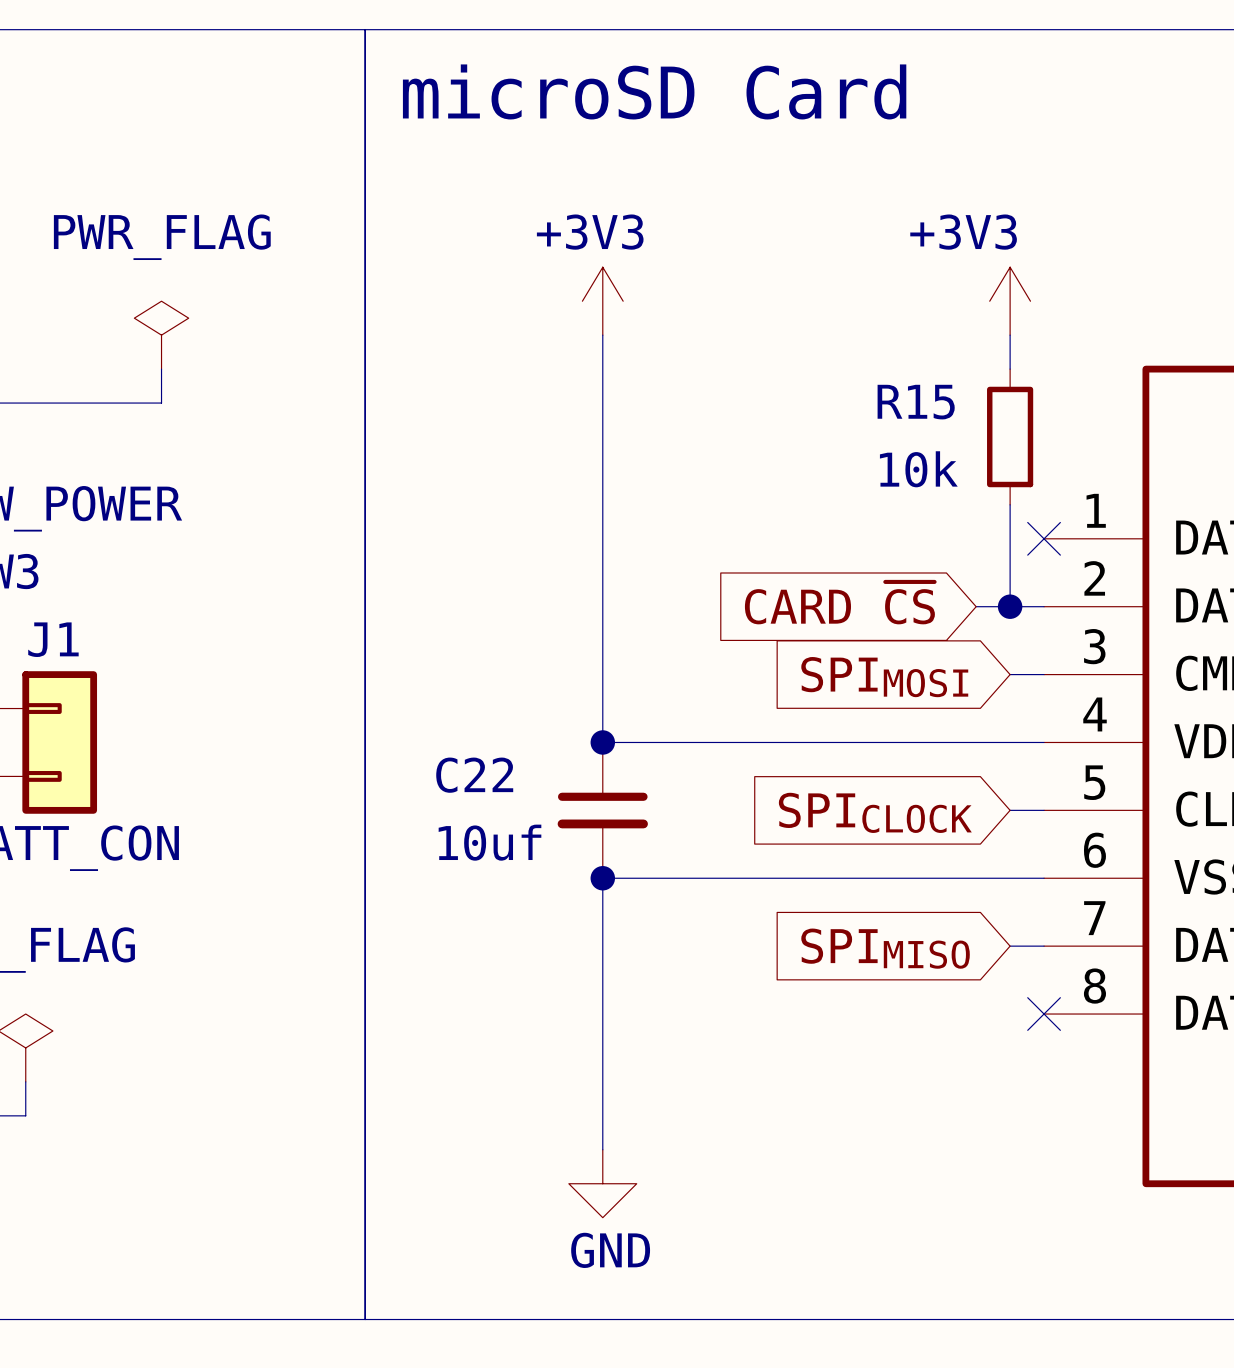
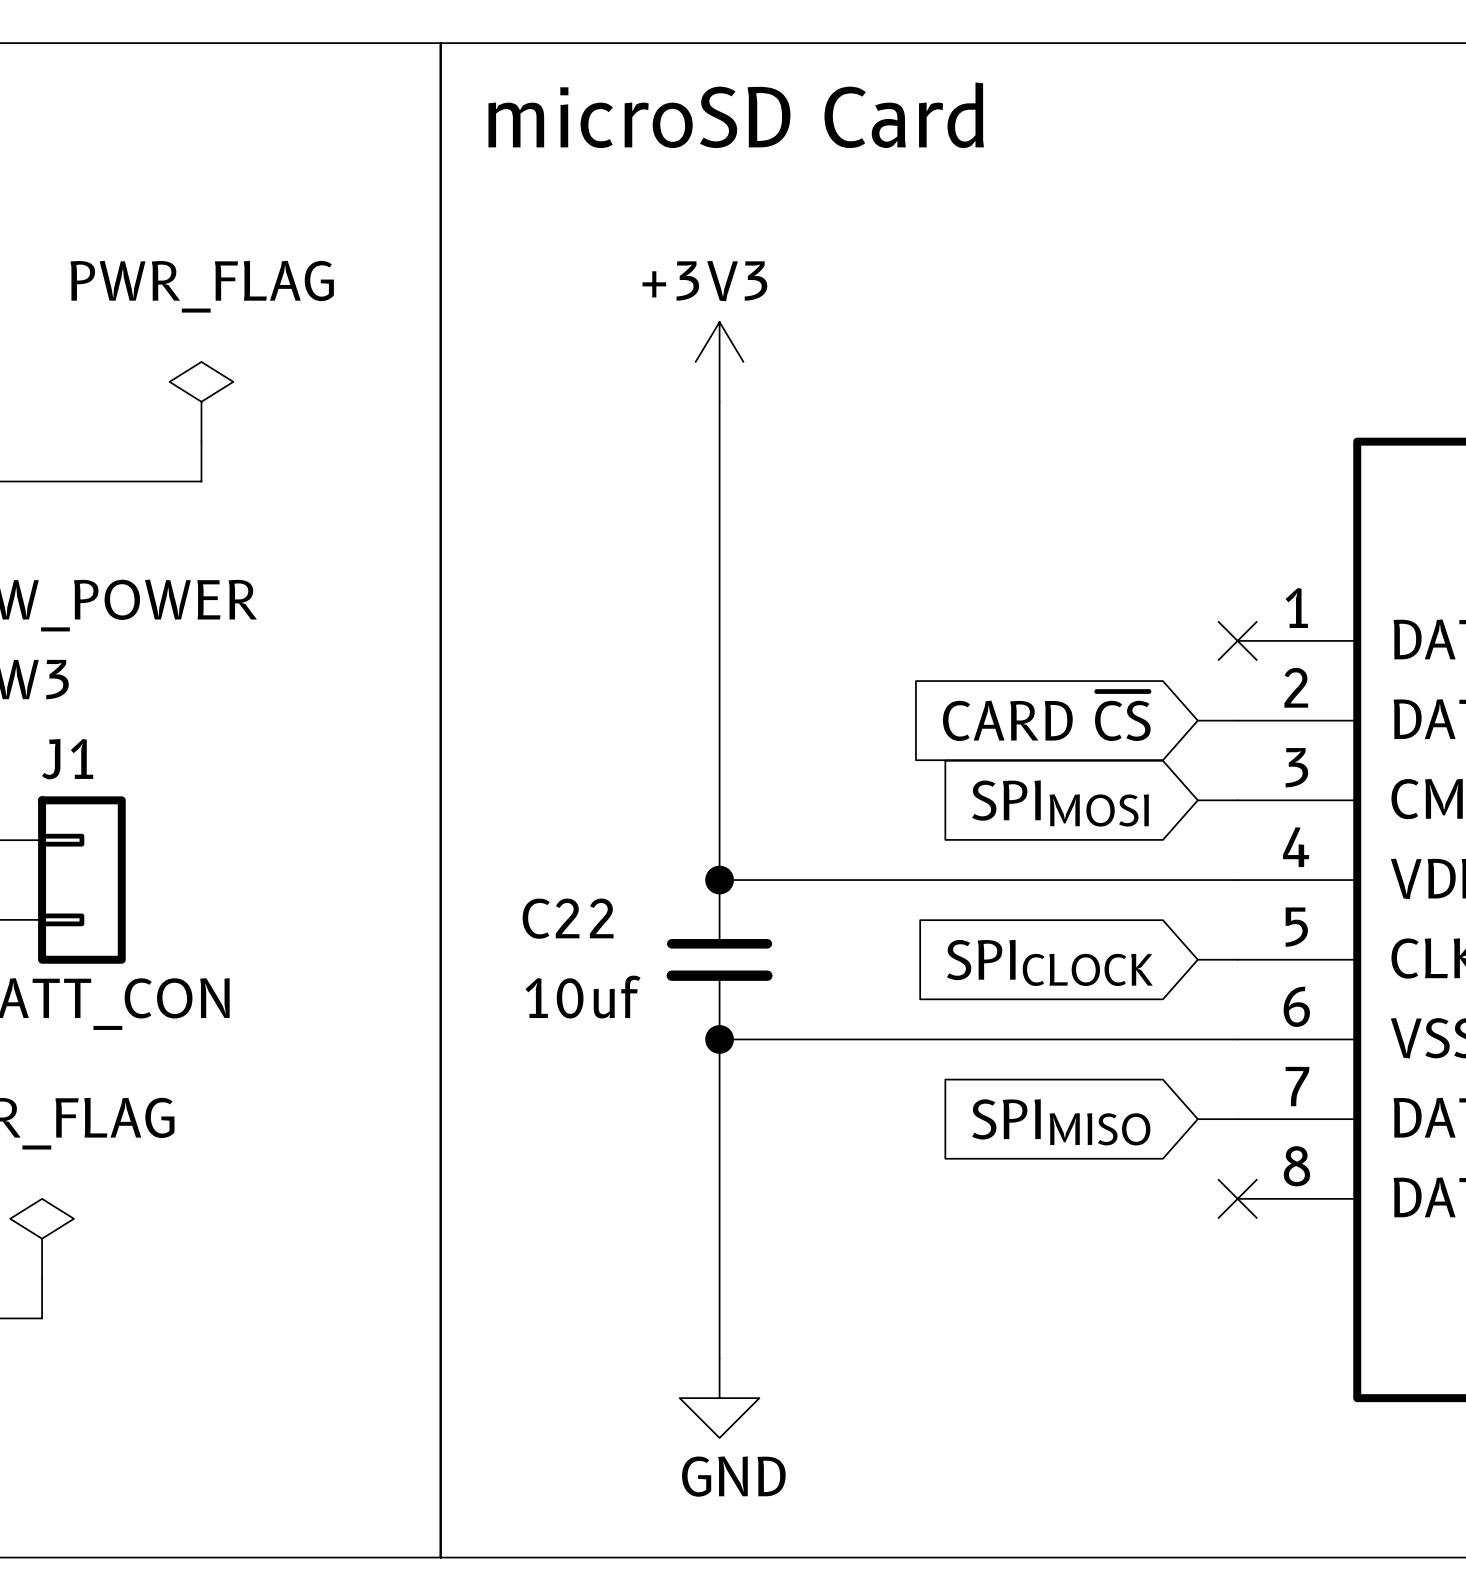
power symbol: +3V3 (1010, 301) -> none
wire: (1010, 335) (1010, 369) -> none
R15: 10k (1010, 436) -> none
wire: (1010, 504) (1010, 606) (976, 606) -> none
global label position: CARD ~{CS} (839, 603) -> CARD ~{CS} (1046, 716)
junction: (1010, 606) -> none

